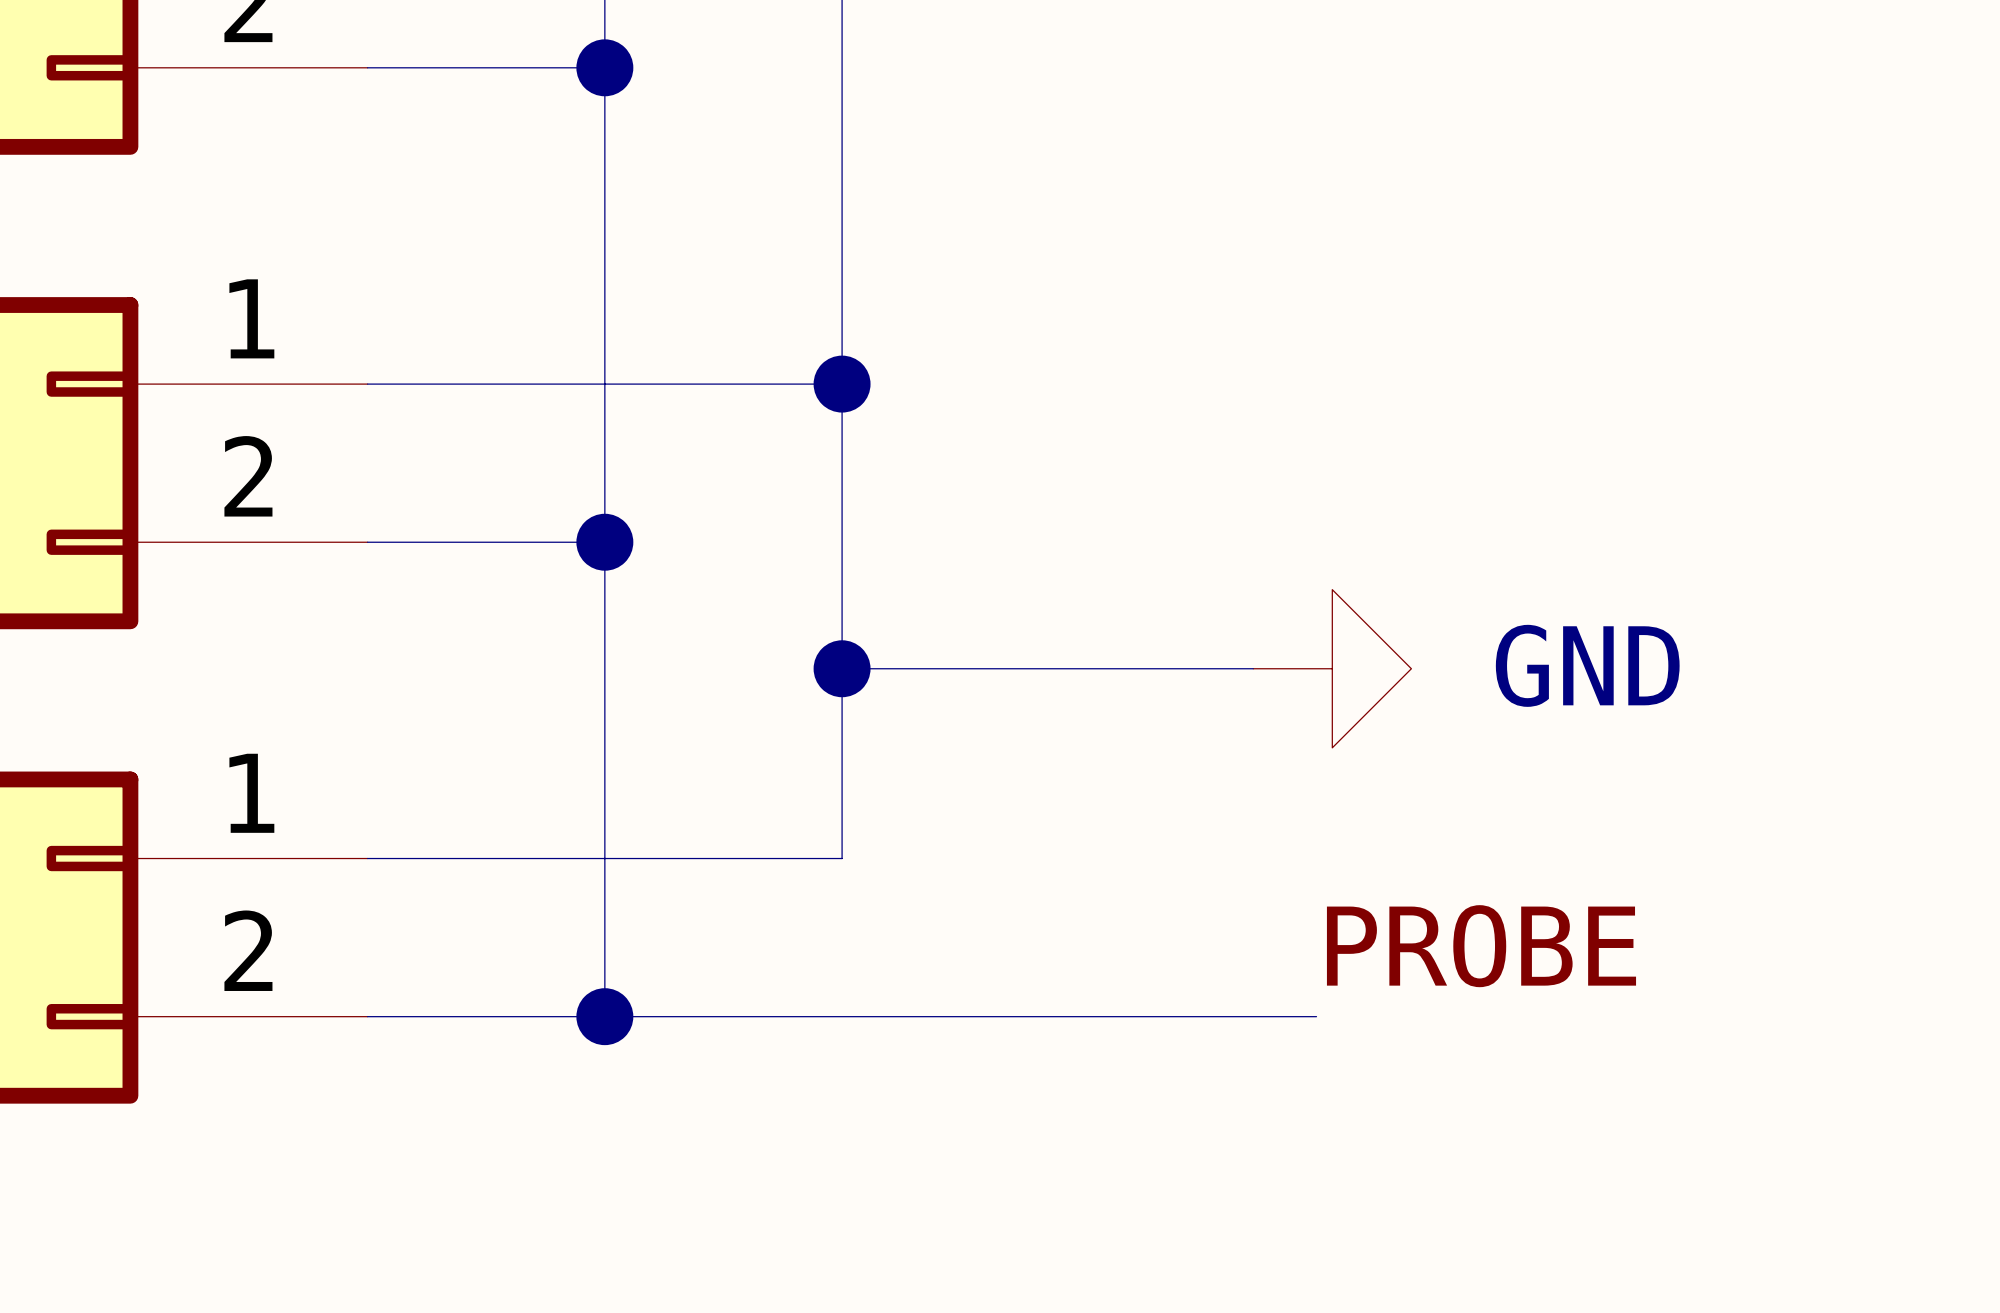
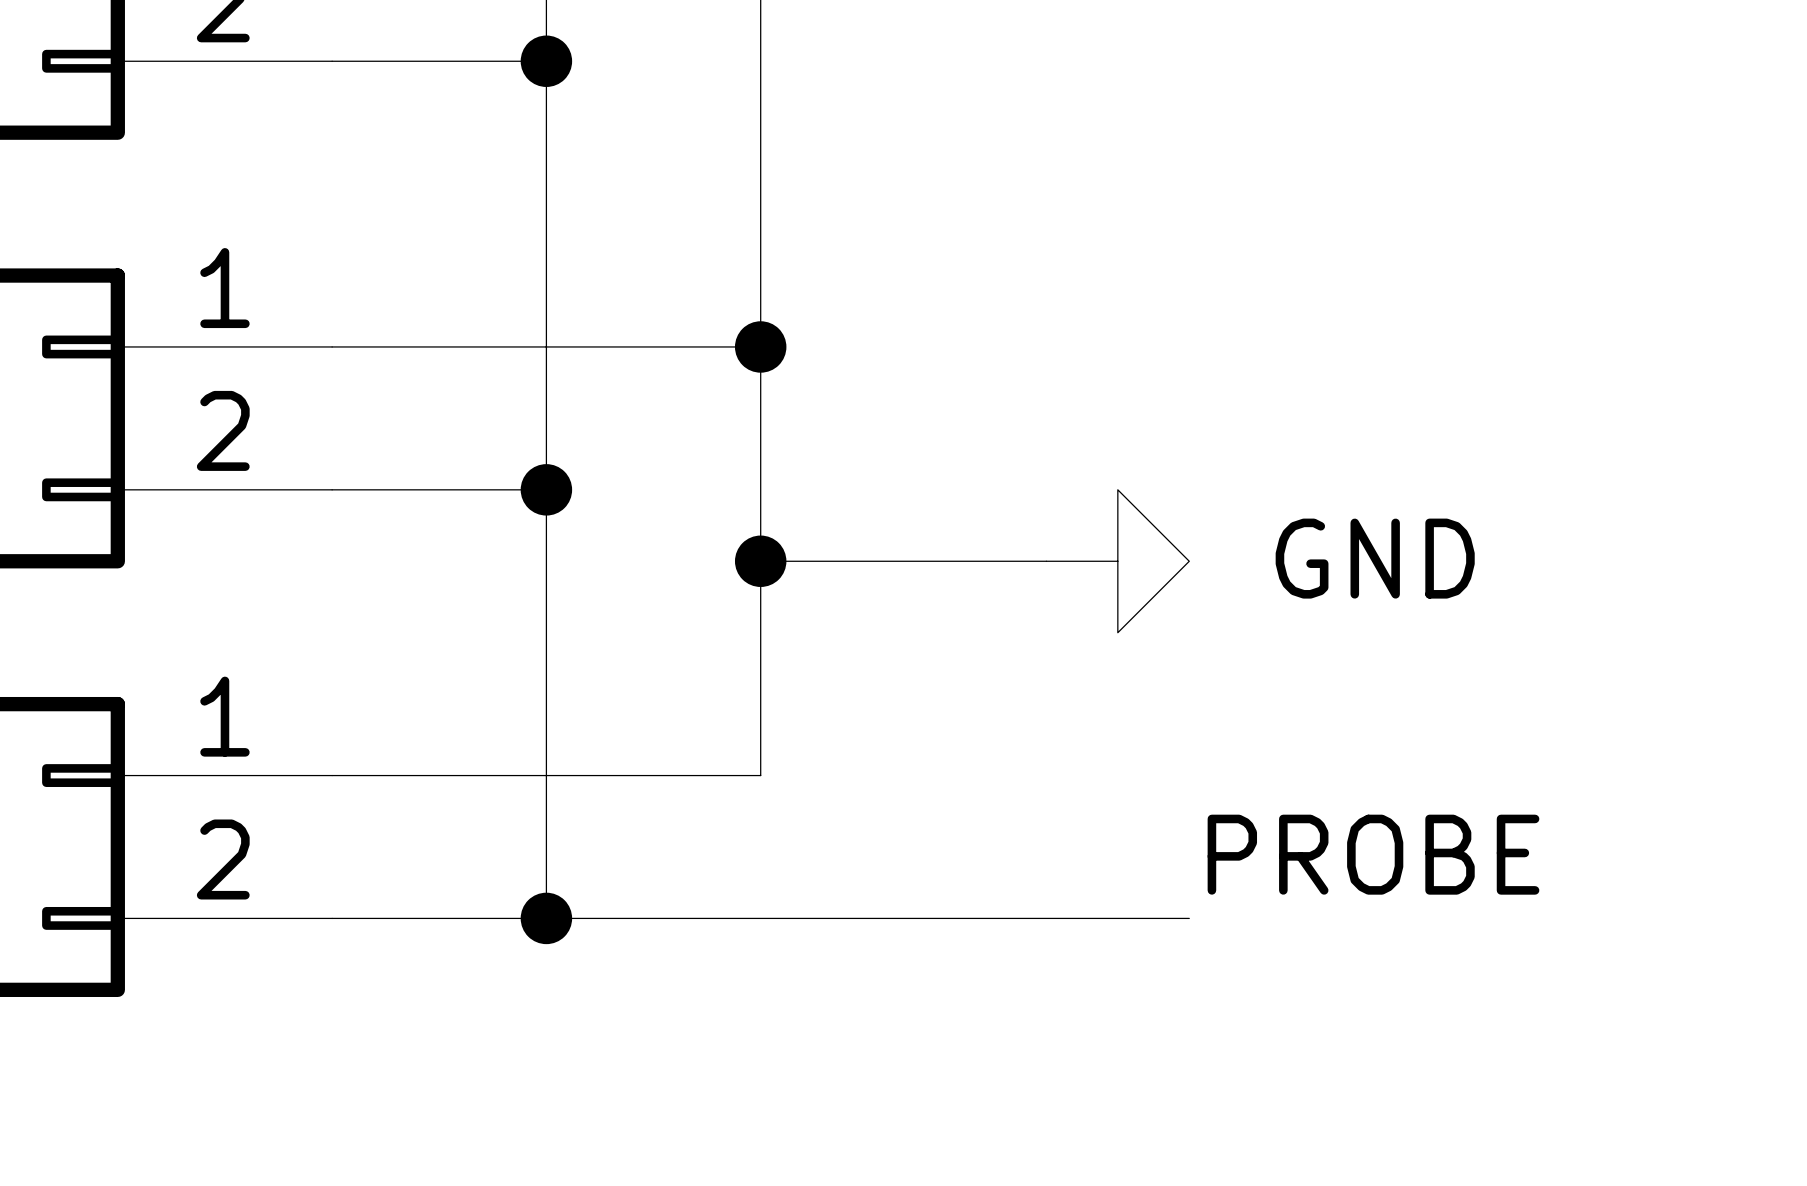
wire: none -> (760, 561) (1046, 561)
wire: (842, 668) (1253, 668) -> none
junction position: (842, 668) -> (760, 561)
power symbol position: GND (1332, 668) -> GND (1117, 561)

